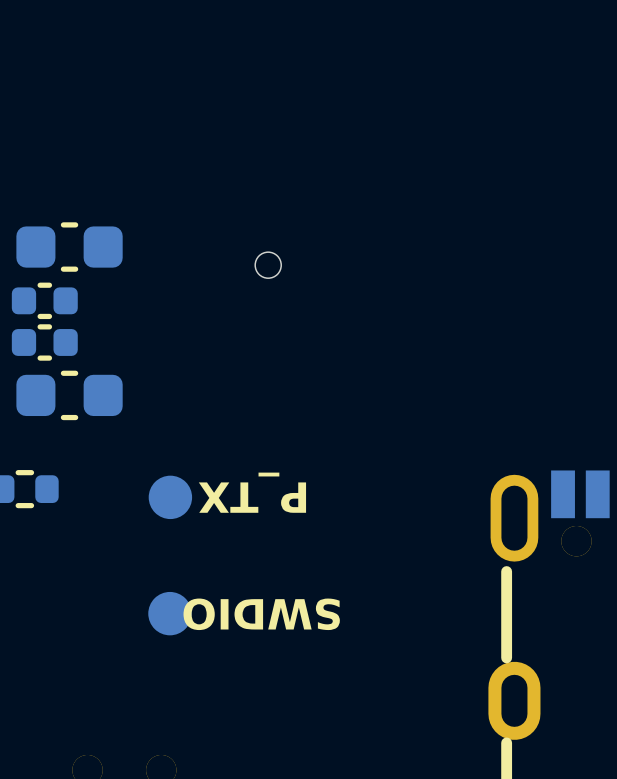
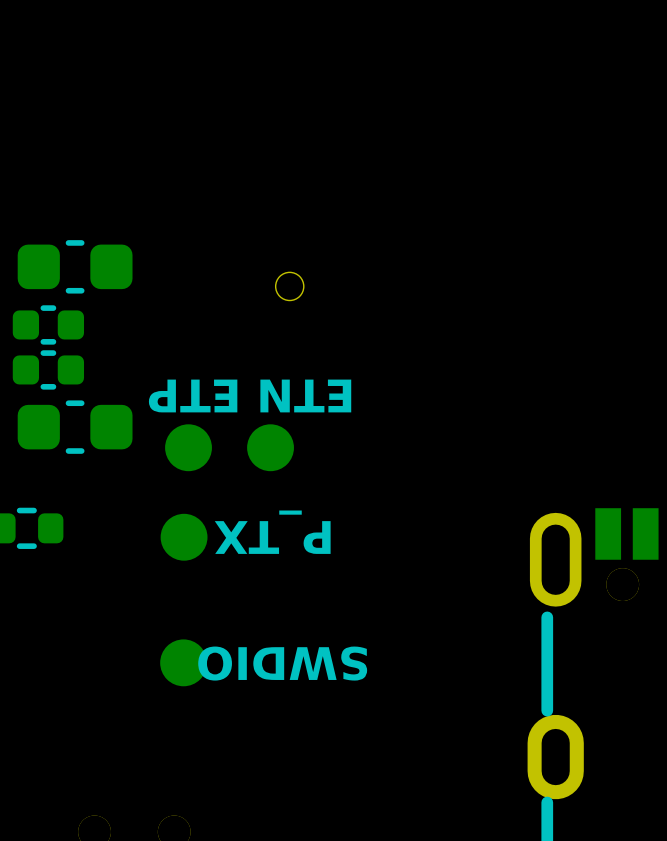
text: none -> ETP (193, 395)
text: none -> ETN (305, 395)
part: none -> (188, 447)
part: none -> (270, 447)

